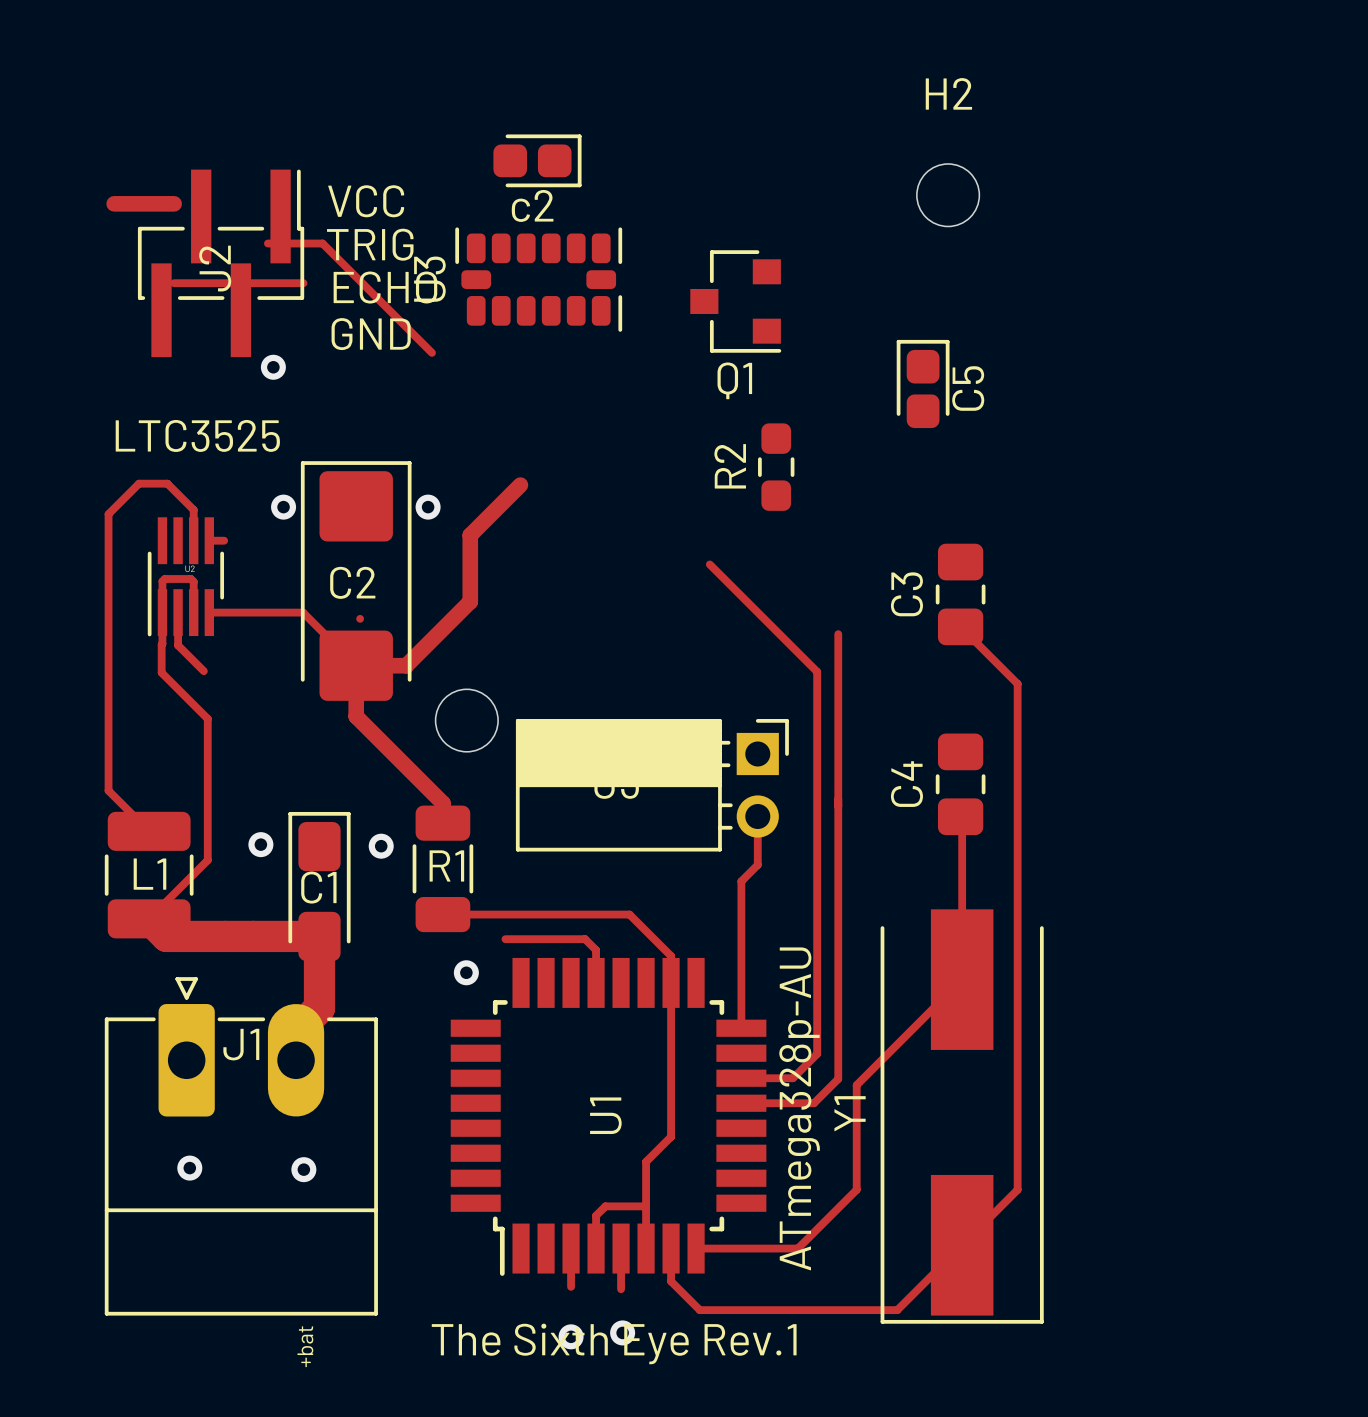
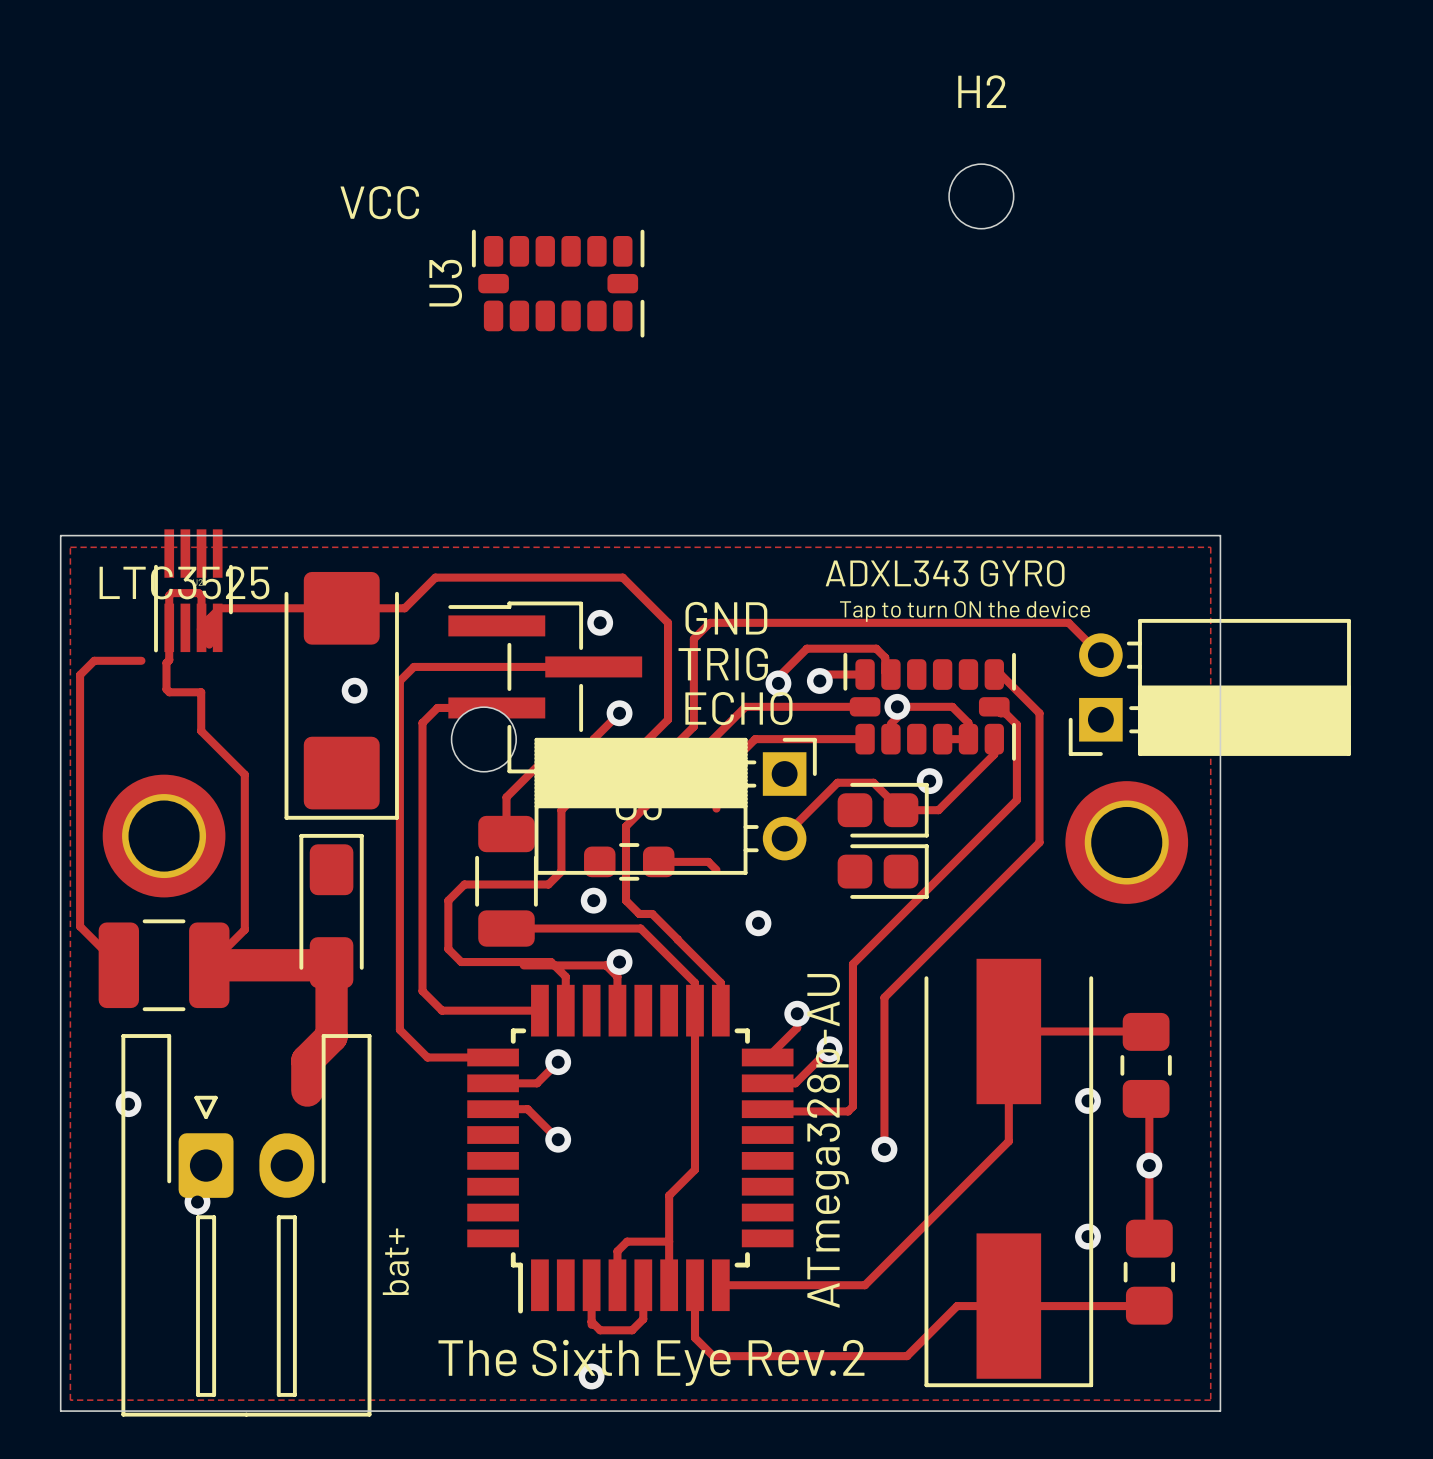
c2: (537, 160) -> none
track: (114, 203) (174, 203) -> none
track: (267, 243) (322, 243) (431, 352) -> none
text position: TRIG (370, 244) -> TRIG (723, 664)
J2: (221, 263) -> none
track: (174, 283) (303, 283) -> none
text position: ECHO (385, 287) -> ECHO (738, 708)
Q1: (735, 301) -> none
text position: GND (371, 334) -> GND (726, 618)
via: (273, 367) -> none
C5: (923, 383) -> none
text position: LTC3525 (197, 435) -> LTC3525 (184, 582)
R2: (776, 467) -> none
track: (520, 485) (470, 535) (470, 601) (406, 665) (356, 665) -> none
via: (283, 507) -> none
via: (428, 507) -> none
board edge: none -> (60, 535) (60, 1411) (1220, 1411) (1220, 535) (60, 535)
zone outline: none -> (70, 547) (70, 1400) (1210, 1400) (1210, 547) (70, 547)
track: (193, 540) (193, 509) (167, 483) (139, 483) (108, 514) (108, 790) (149, 831) -> none
track: (209, 540) (224, 540) -> none
text: none -> ADXL343 GYRO (945, 573)
track: (709, 564) (817, 671) (817, 1054) (792, 1078) (741, 1078) -> (994, 706) (1000, 713) (1005, 713) (1016, 724) (1016, 800) (852, 964) (852, 1106) (848, 1111) (769, 1111) (767, 1109)
C2: (356, 581) -> none
C3: (960, 594) -> none
text: none -> Tap to turn ON the device (965, 611)
via: none -> (600, 622)
track: (178, 612) (178, 645) (203, 671) -> none
track: (209, 612) (303, 612) (356, 665) -> none
track: (960, 626) (1017, 683) (1017, 1189) (897, 1310) (699, 1310) (671, 1281) -> (1148, 1306) (957, 1306) (907, 1356) (713, 1356) (694, 1337) (694, 1319)
track: none -> (209, 644) (209, 618) (219, 608) (404, 608) (435, 577) (622, 577) (668, 622) (668, 719) (638, 748) (554, 748) (506, 797) (506, 834)
track: (838, 634) (838, 1079) (814, 1103) (741, 1103) -> none
track: none -> (1100, 655) (1068, 622) (710, 622) (693, 638) (693, 726) (636, 784) (587, 784) (561, 810) (561, 871) (548, 884) (464, 884) (448, 900) (448, 949) (461, 962) (551, 962) (565, 976) (565, 1010)
track: none -> (141, 660) (94, 660) (80, 675) (80, 926) (118, 965)
track: (161, 644) (161, 672) (207, 718) (207, 860) (149, 918) (166, 936) (319, 936) -> (168, 660) (166, 662) (166, 689) (169, 692) (201, 692) (201, 731) (244, 774) (244, 929) (209, 965) (328, 965) (331, 962)
track: none -> (593, 666) (413, 666) (399, 680) (399, 1029) (427, 1057) (493, 1057)
track: none -> (865, 674) (826, 674) (819, 680)
track: none -> (890, 674) (885, 672) (885, 657) (876, 648) (806, 648) (778, 677) (778, 683)
track: none -> (994, 674) (1000, 674) (1039, 713) (1039, 842) (884, 997) (884, 1149)
via: none -> (819, 680)
track: (356, 665) (356, 716) (442, 803) (442, 823) -> none
via: none -> (778, 683)
part: none -> (545, 687)
part: none -> (1209, 687)
via: none -> (354, 690)
part: none -> (341, 695)
track: none -> (865, 706) (745, 706) (626, 826) (626, 900) (639, 913) (652, 913) (677, 939)
via: none -> (897, 706)
part: none -> (929, 706)
track: none -> (496, 707) (437, 707) (422, 722) (422, 991) (442, 1010) (539, 1010)
track: none -> (619, 713) (593, 739) (593, 748)
via: none -> (619, 713)
track: none -> (890, 723) (907, 706) (952, 706) (968, 722) (968, 739) (942, 739)
track: none -> (865, 739) (755, 739) (716, 777) (716, 808)
track: none -> (994, 739) (994, 754) (938, 810) (901, 810) (873, 782) (837, 782) (781, 839)
via: none -> (929, 781)
C4: (960, 784) -> none
part: none -> (883, 810)
part: none -> (164, 836)
track: (757, 816) (757, 864) (741, 881) (741, 1028) -> (797, 1013) (797, 1027) (767, 1057)
track: (960, 816) (962, 818) (962, 979) (856, 1085) (856, 1189) (797, 1248) -> (1145, 1031) (1008, 1031) (1008, 1141) (864, 1285) (826, 1285)
part: none -> (1126, 842)
part: none -> (629, 861)
track: none -> (658, 861) (708, 861) (716, 869)
via: (260, 844) -> none
via: (381, 846) -> none
part: none -> (883, 871)
part: none -> (506, 881)
R1: (442, 868) -> none
L1: (149, 875) -> none
via: none -> (593, 900)
C1 name: C1 (318, 887) -> none
via: none -> (758, 923)
track: (442, 914) (629, 914) -> (506, 928) (640, 928) (652, 939)
track: none -> (677, 939) (720, 982) (720, 1010)
via: none -> (619, 962)
part: none -> (164, 965)
via: (466, 972) -> none
via: none -> (797, 1013)
track: none -> (829, 1049) (795, 1083) (767, 1083)
via: none -> (829, 1049)
track: none -> (558, 1062) (537, 1083) (493, 1083)
via: none -> (558, 1062)
part: none -> (1146, 1065)
track: none -> (1146, 1098) (1149, 1102) (1149, 1238)
via: none -> (1087, 1100)
via: none -> (128, 1104)
track: none -> (493, 1109) (527, 1109) (558, 1139)
via: none -> (558, 1139)
Y1 name: Y1 (850, 1113) -> none
U1 name: U1 (605, 1115) -> none
Y1 position: (962, 1116) -> (1008, 1172)
via: none -> (884, 1149)
via: none -> (1149, 1165)
J1: (241, 1146) -> none
via: (303, 1169) -> none
part: none -> (246, 1225)
via: none -> (1087, 1236)
text: none -> bat+ (395, 1261)
part: none -> (1149, 1272)
track: (621, 1281) (621, 1289) -> (643, 1319) (632, 1330) (600, 1330) (591, 1321)
via: (622, 1332) -> none
text: The Sixth Eye Rev.1 (614, 1343) -> The Sixth Eye Rev.2 (651, 1362)
text: +bat (305, 1346) -> none

